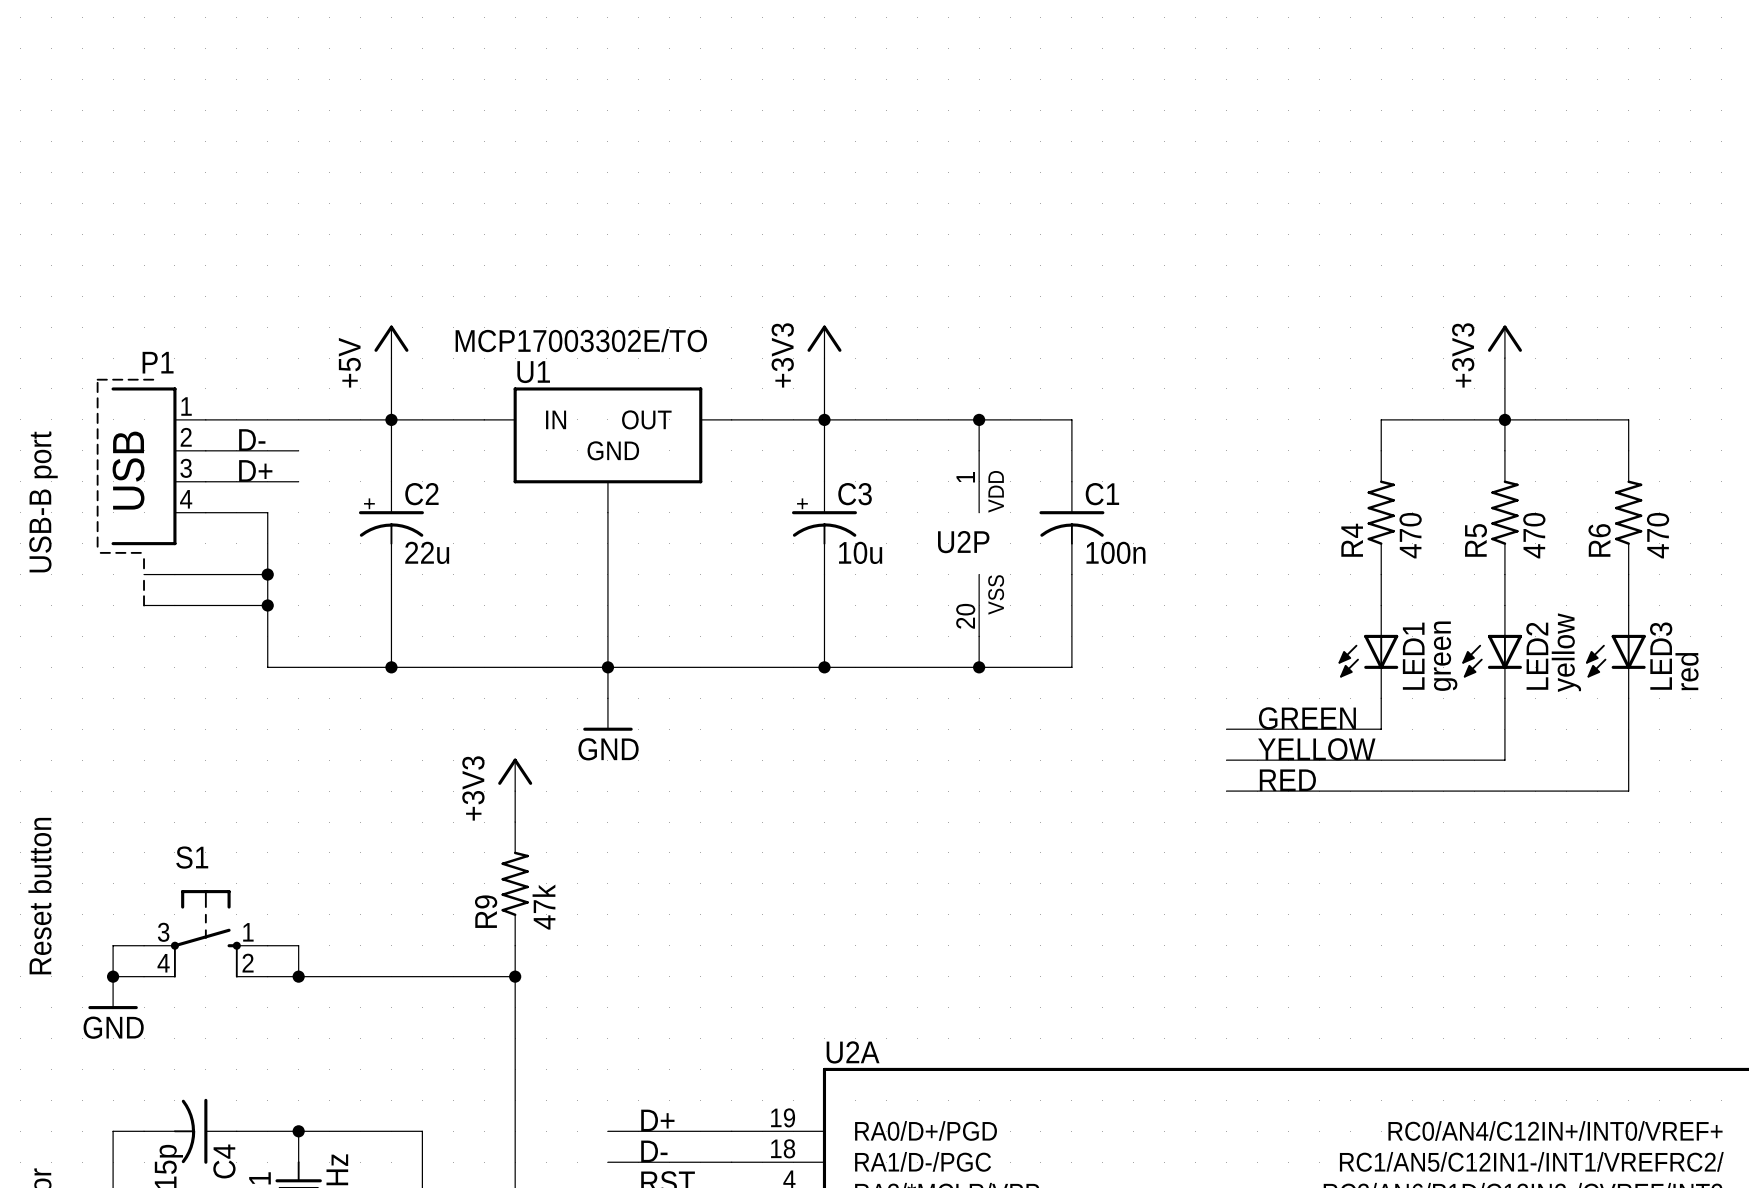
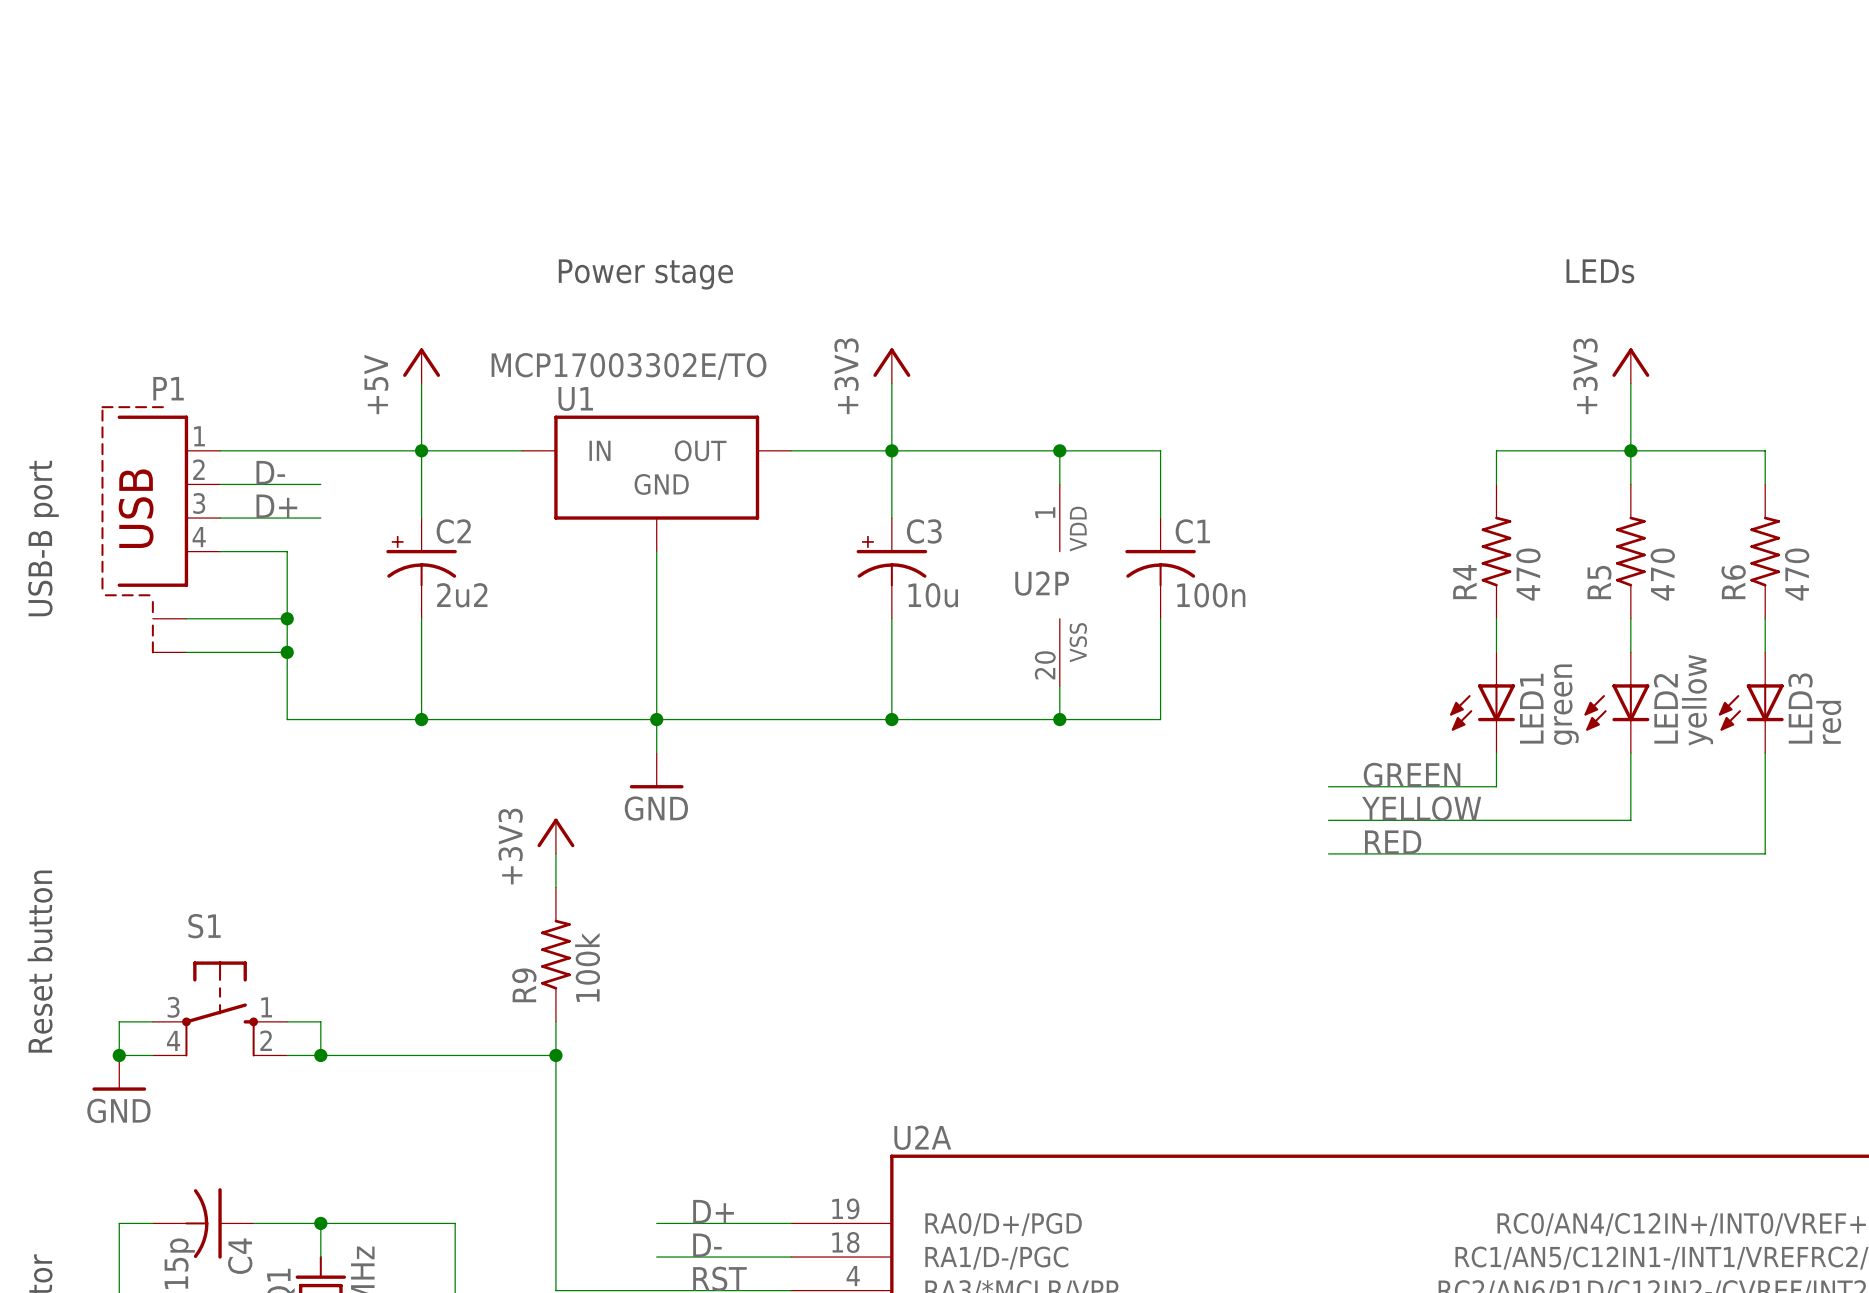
text: none -> LEDs (1600, 271)
text: none -> Power stage (645, 274)
C2 value: 22u (427, 552) -> 2u2 (462, 595)
R9 value: 47k (543, 907) -> 100k (587, 967)

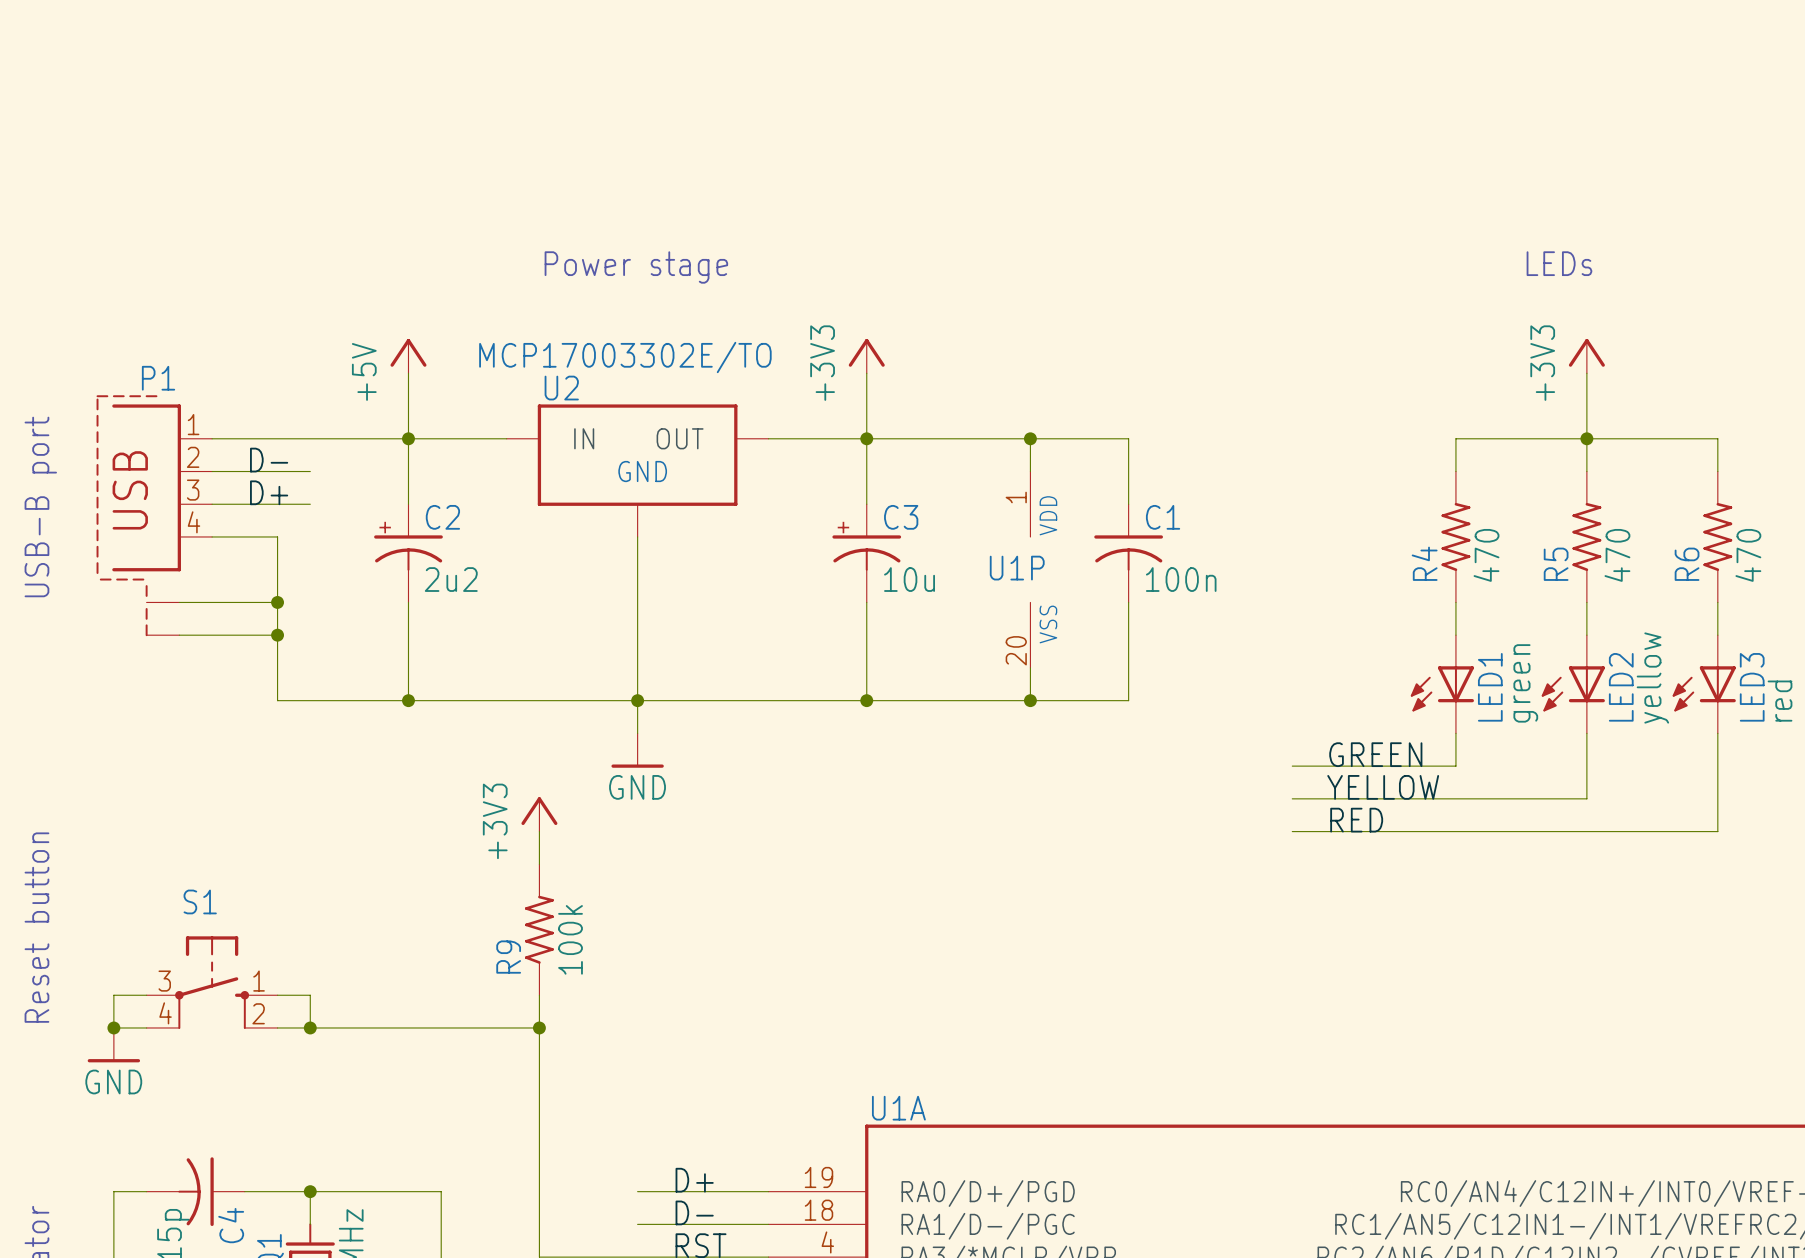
U1 name: U1 (575, 399) -> U2 (561, 388)
U2P name: U2P (1042, 583) -> U1P (1017, 568)
U2A name: U2A (922, 1137) -> U1A (898, 1108)

